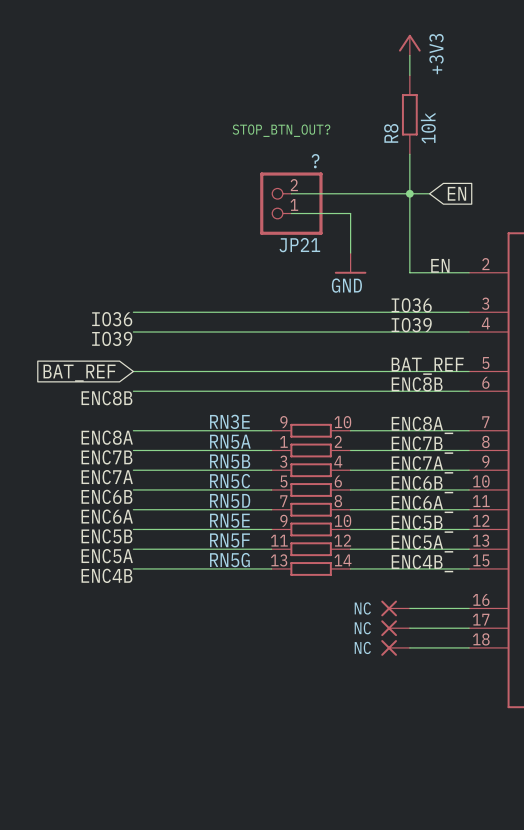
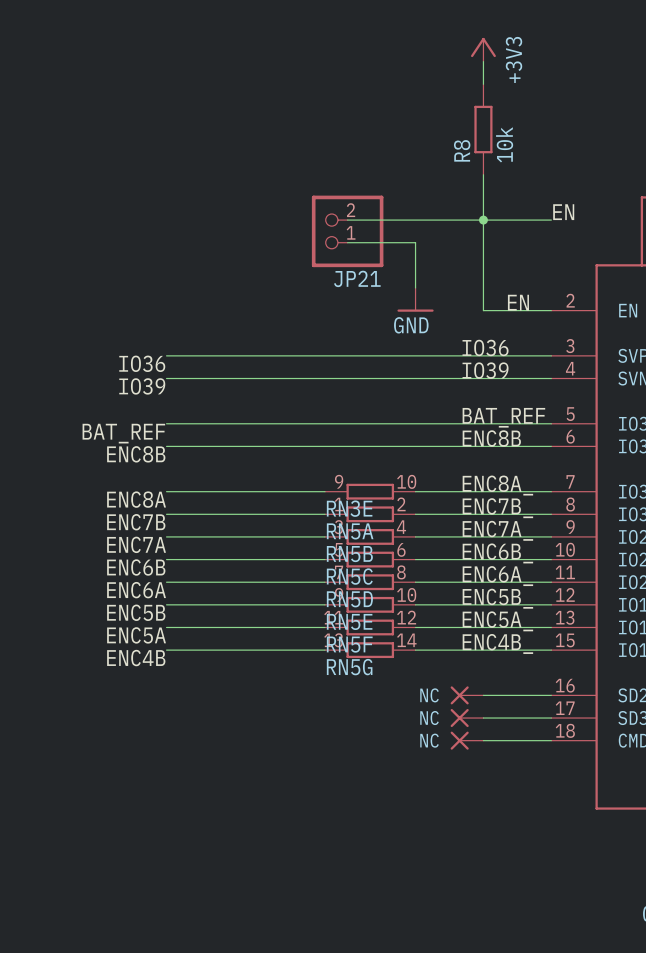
text: STOP_BTN_OUT? (281, 130) -> none
JP21 value: ? (315, 161) -> none
label: none -> EN (563, 212)
wire: none -> (506, 220) (551, 220)
global label: EN (456, 193) -> none
global label: BAT_REF (79, 373) -> none
label: none -> BAT_REF (123, 433)
RN3E name position: RN3E (229, 421) -> RN3E (349, 508)
RN5A name position: RN5A (230, 441) -> RN5A (350, 531)
RN5B name position: RN5B (230, 461) -> RN5B (349, 554)
RN5C name position: RN5C (230, 481) -> RN5C (349, 576)
RN5D name position: RN5D (230, 500) -> RN5D (349, 599)
RN5E name position: RN5E (229, 520) -> RN5E (349, 621)
RN5F name position: RN5F (230, 540) -> RN5F (349, 644)
RN5G name position: RN5G (229, 560) -> RN5G (349, 667)

